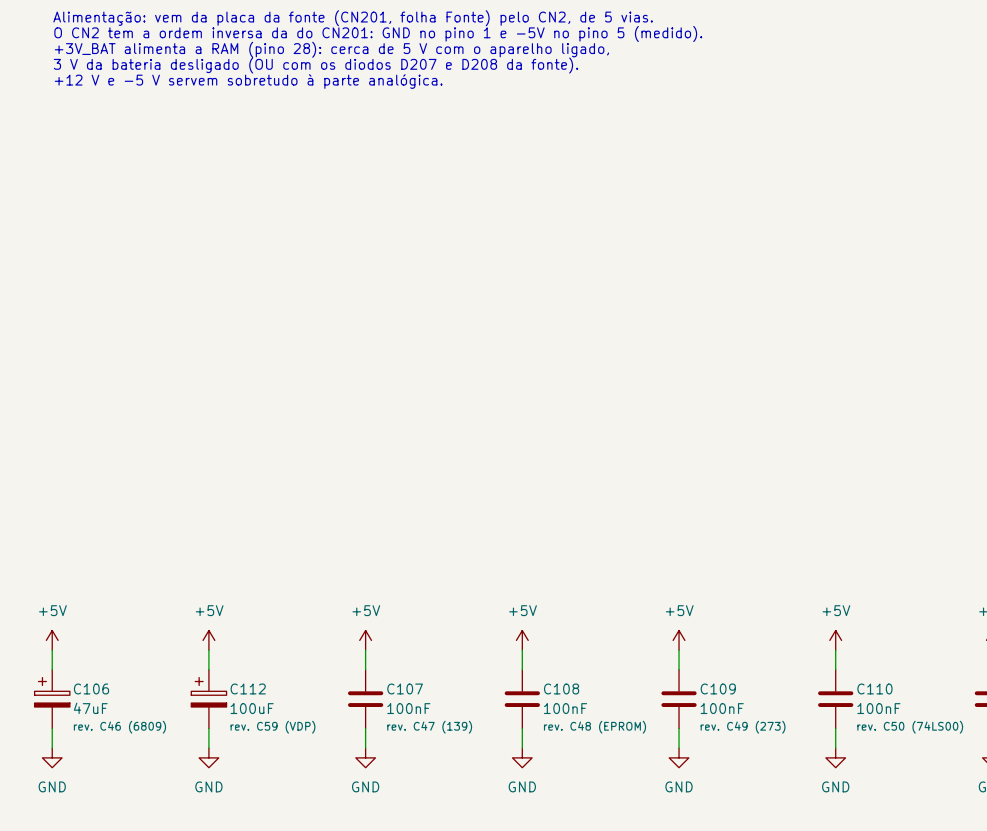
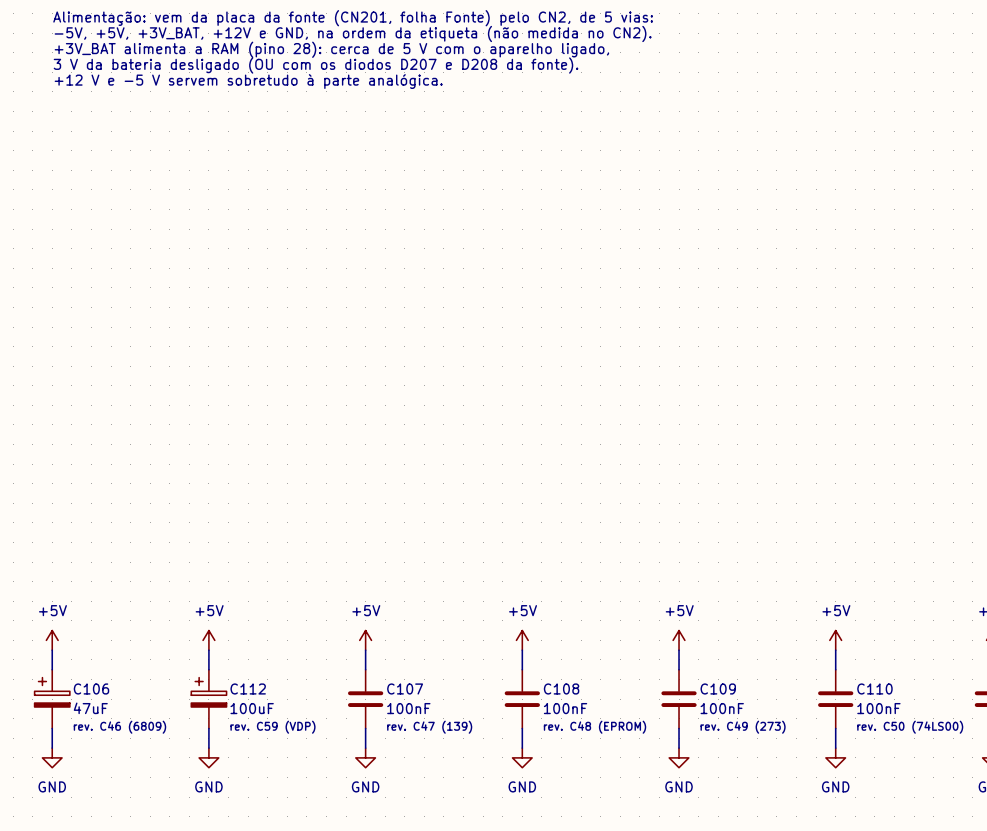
text: Alimentação: vem da placa da fonte (CN201, folha Fonte) pelo CN2, de 5 vias. (353, 18) -> Alimentação: vem da placa da fonte (CN201, folha Fonte) pelo CN2, de 5 vias: (353, 18)
text: O CN2 tem a ordem inversa da do CN201: GND no pino 1 e -5V no pino 5 (medido). (378, 33) -> -5V, +5V, +3V_BAT, +12V e GND, na ordem da etiqueta (não medida no CN2). (353, 33)

